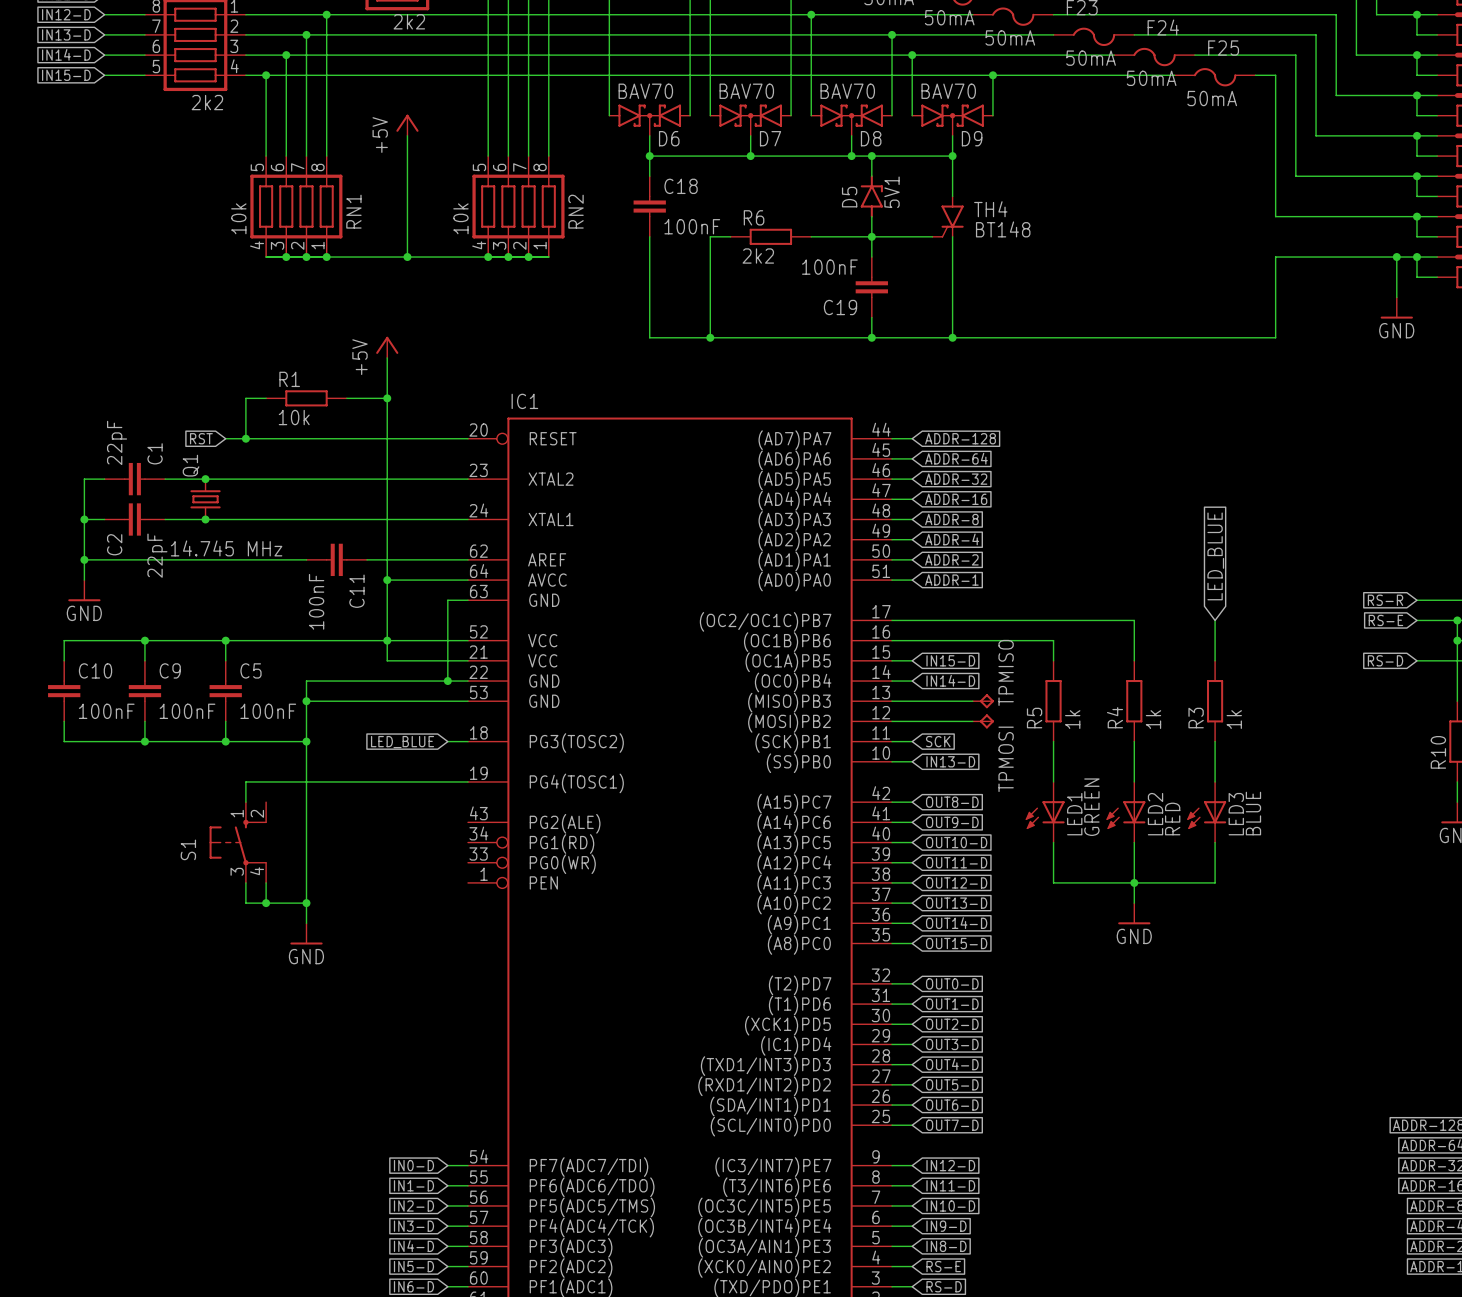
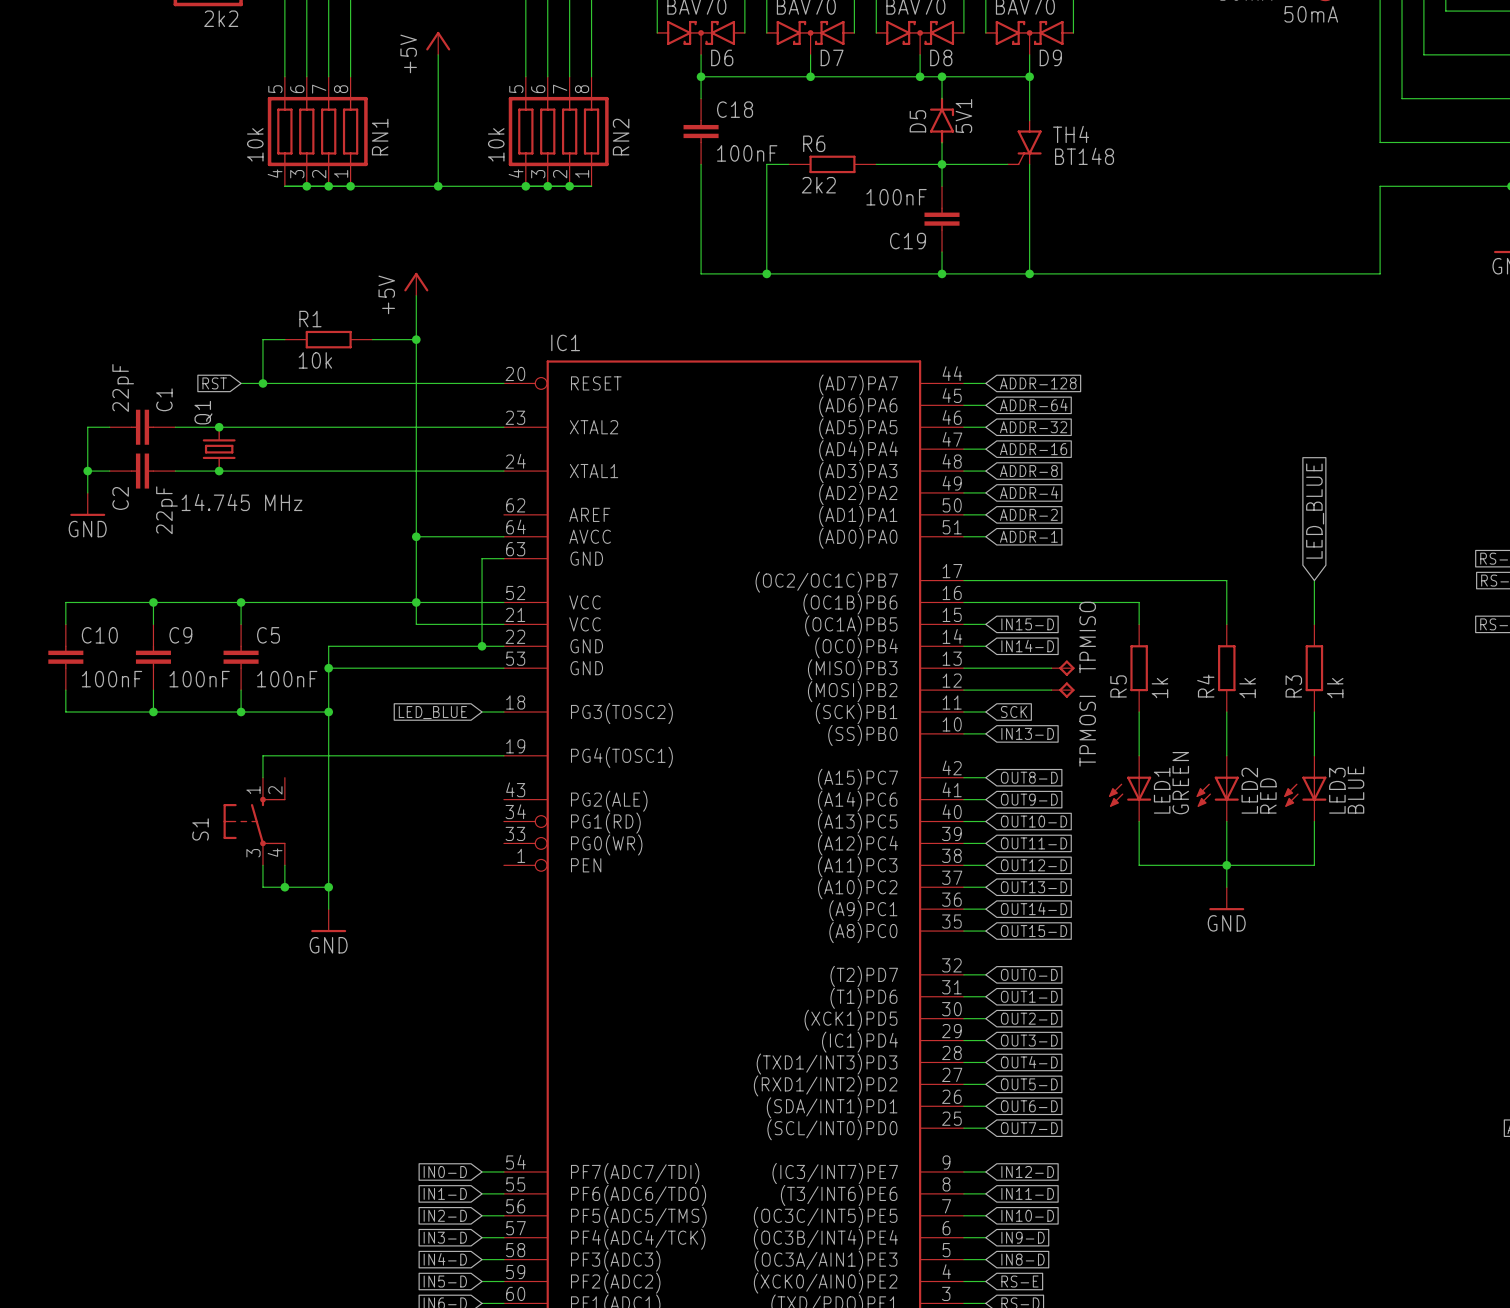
wire: (84, 559) (306, 559) -> none
junction: (84, 559) -> none
C11: 100nF (336, 559) -> none
wire: (367, 559) (468, 559) -> none
power symbol position: GND (84, 590) -> GND (87, 504)

